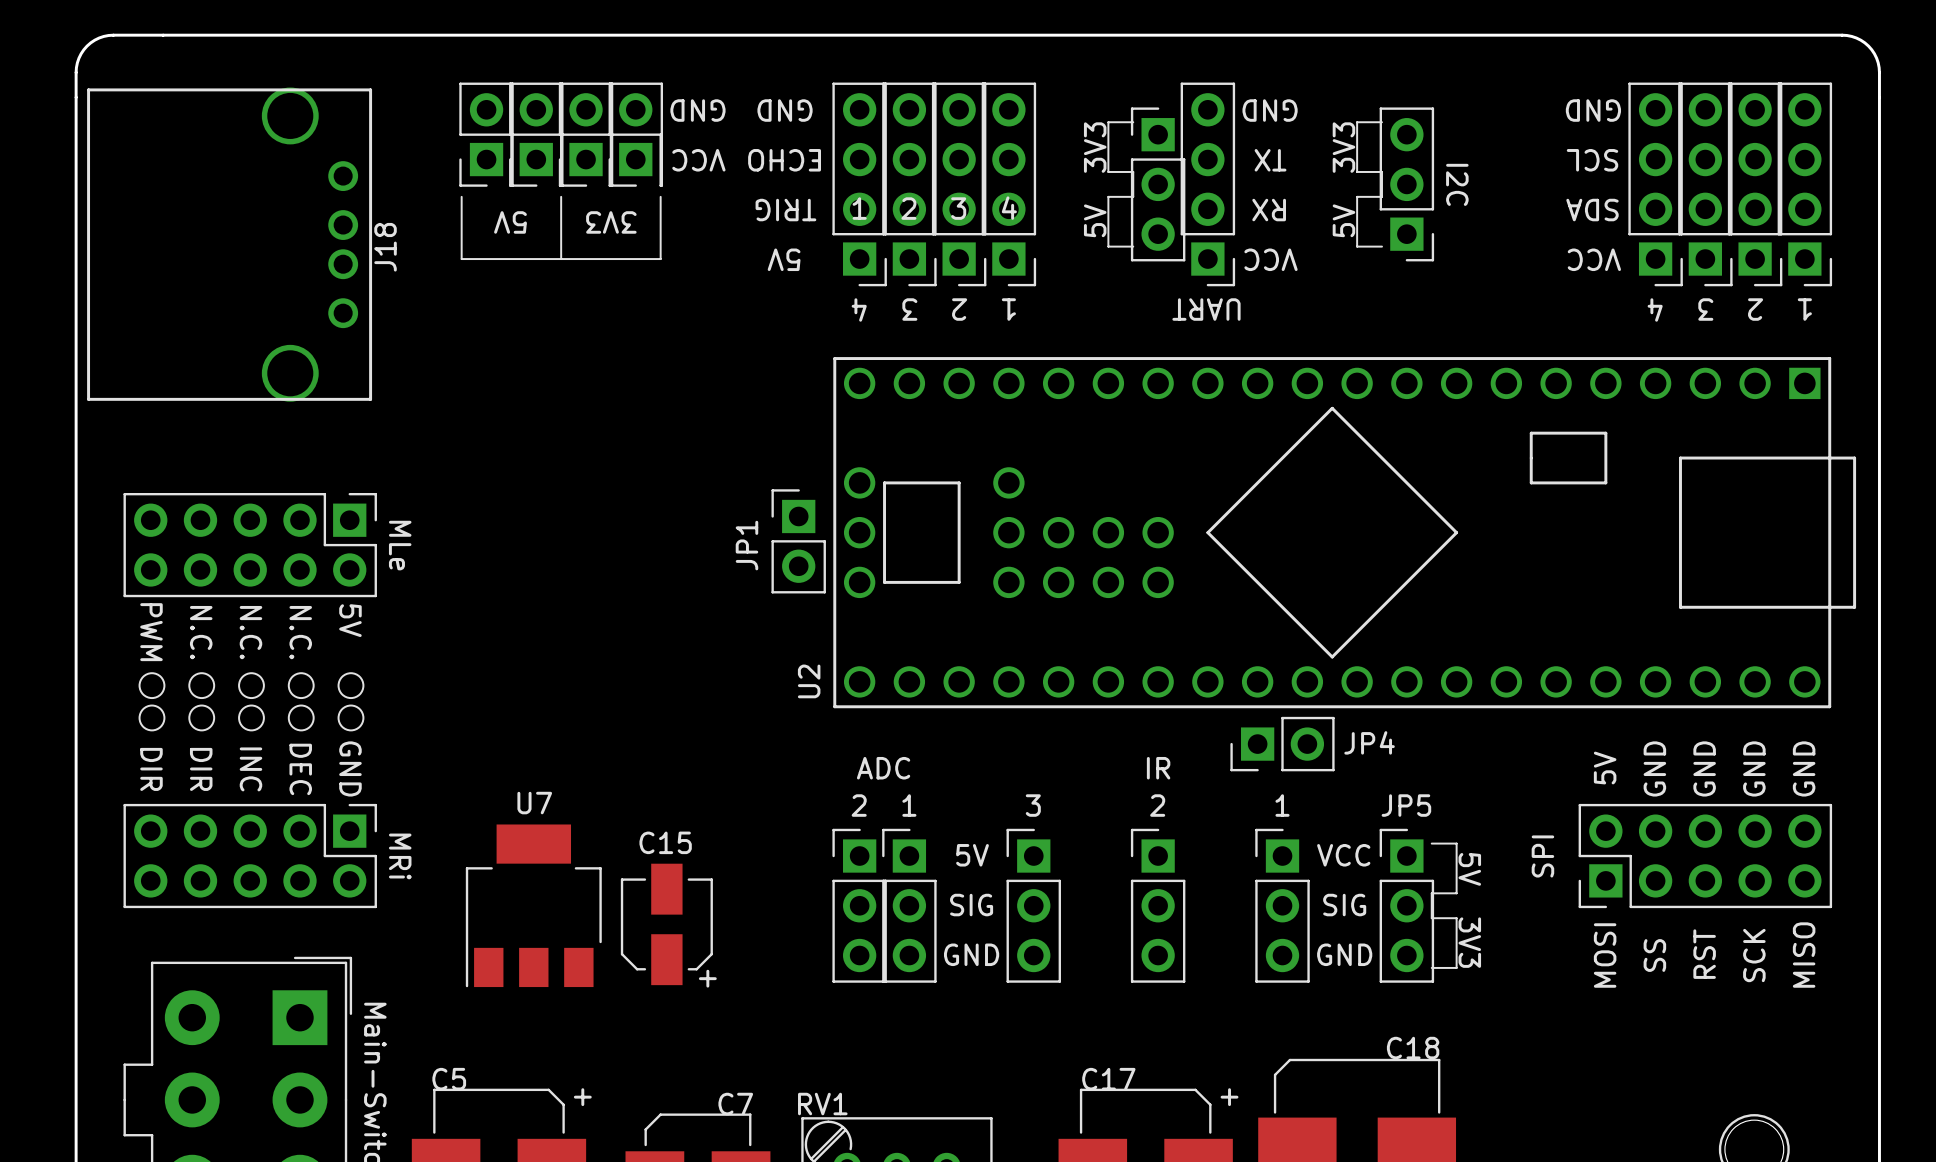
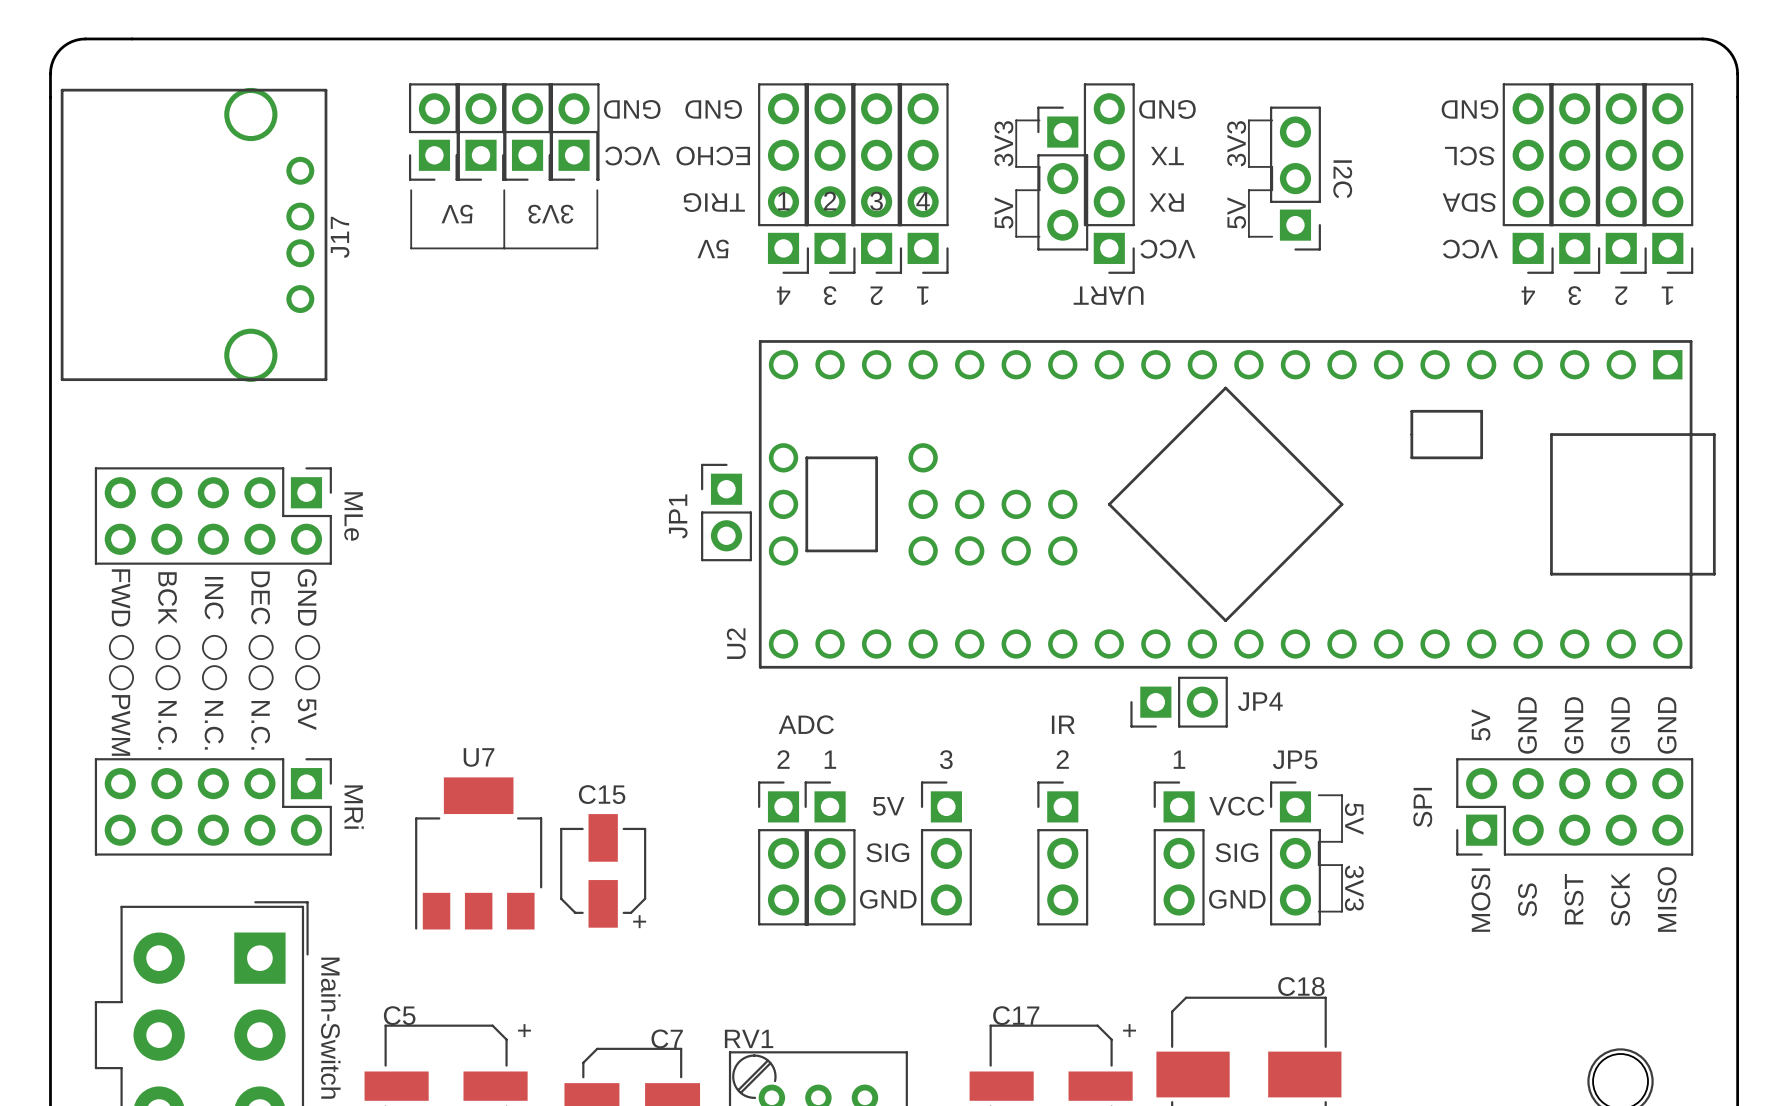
J18 name: J18 (385, 247) -> J17 (340, 237)
text: 5V (350, 620) -> GND (307, 597)
text: PWM (151, 632) -> FWD (120, 597)
text: N.C. (201, 632) -> BCK (167, 598)
text: N.C. (250, 632) -> INC (214, 598)
text: N.C. (300, 632) -> DEC (260, 598)
text: GND (350, 768) -> 5V (307, 714)
text: DIR (151, 769) -> PWM (120, 725)
text: DIR (201, 769) -> N.C. (167, 725)
text: INC (250, 769) -> N.C. (214, 725)
text: DEC (300, 769) -> N.C. (260, 725)

